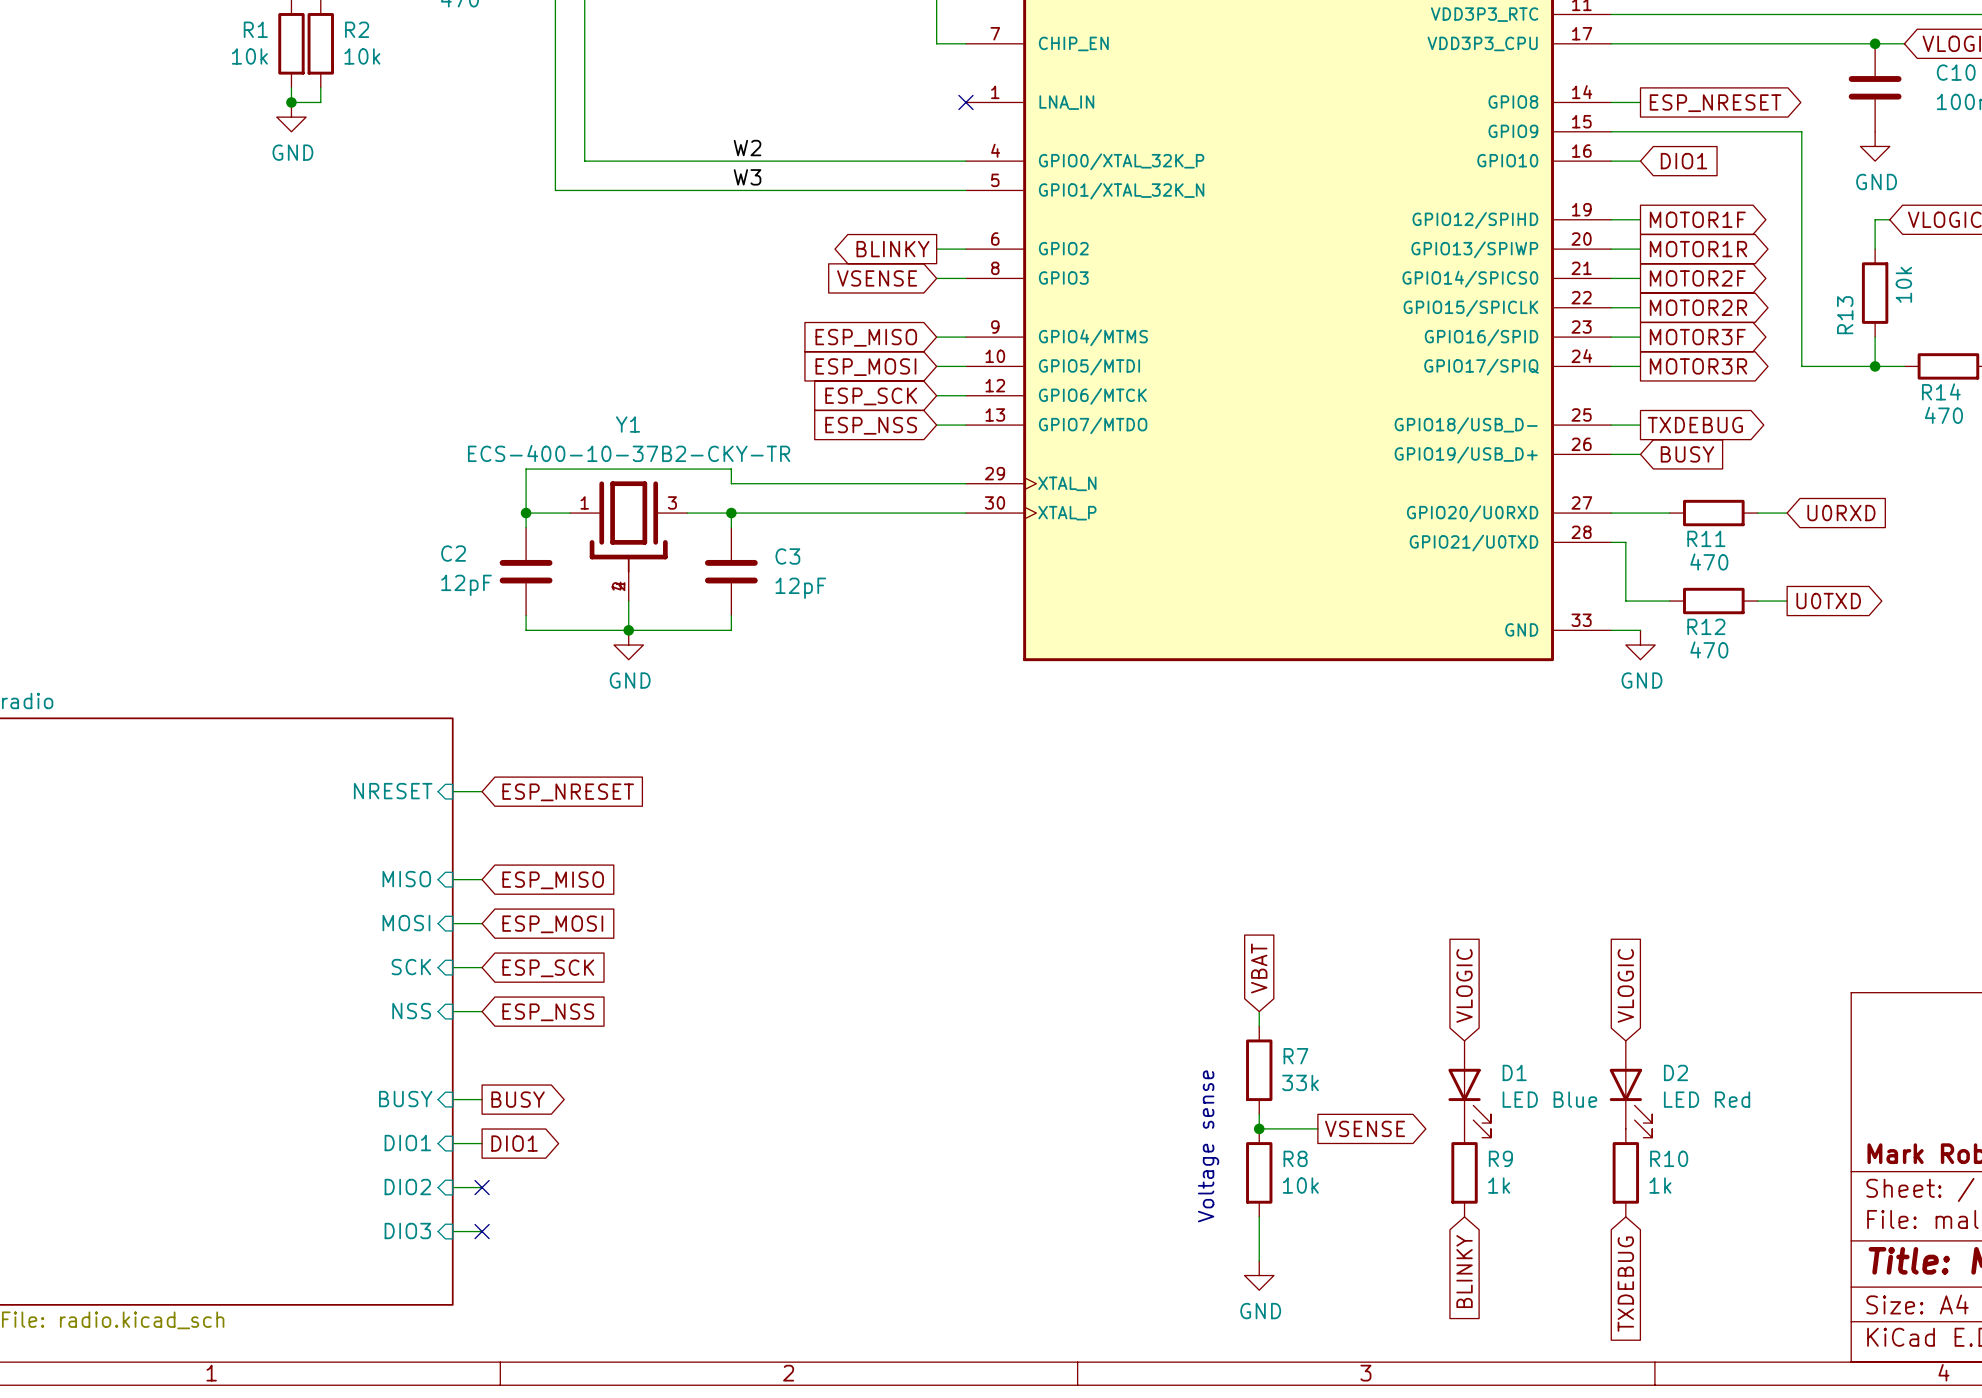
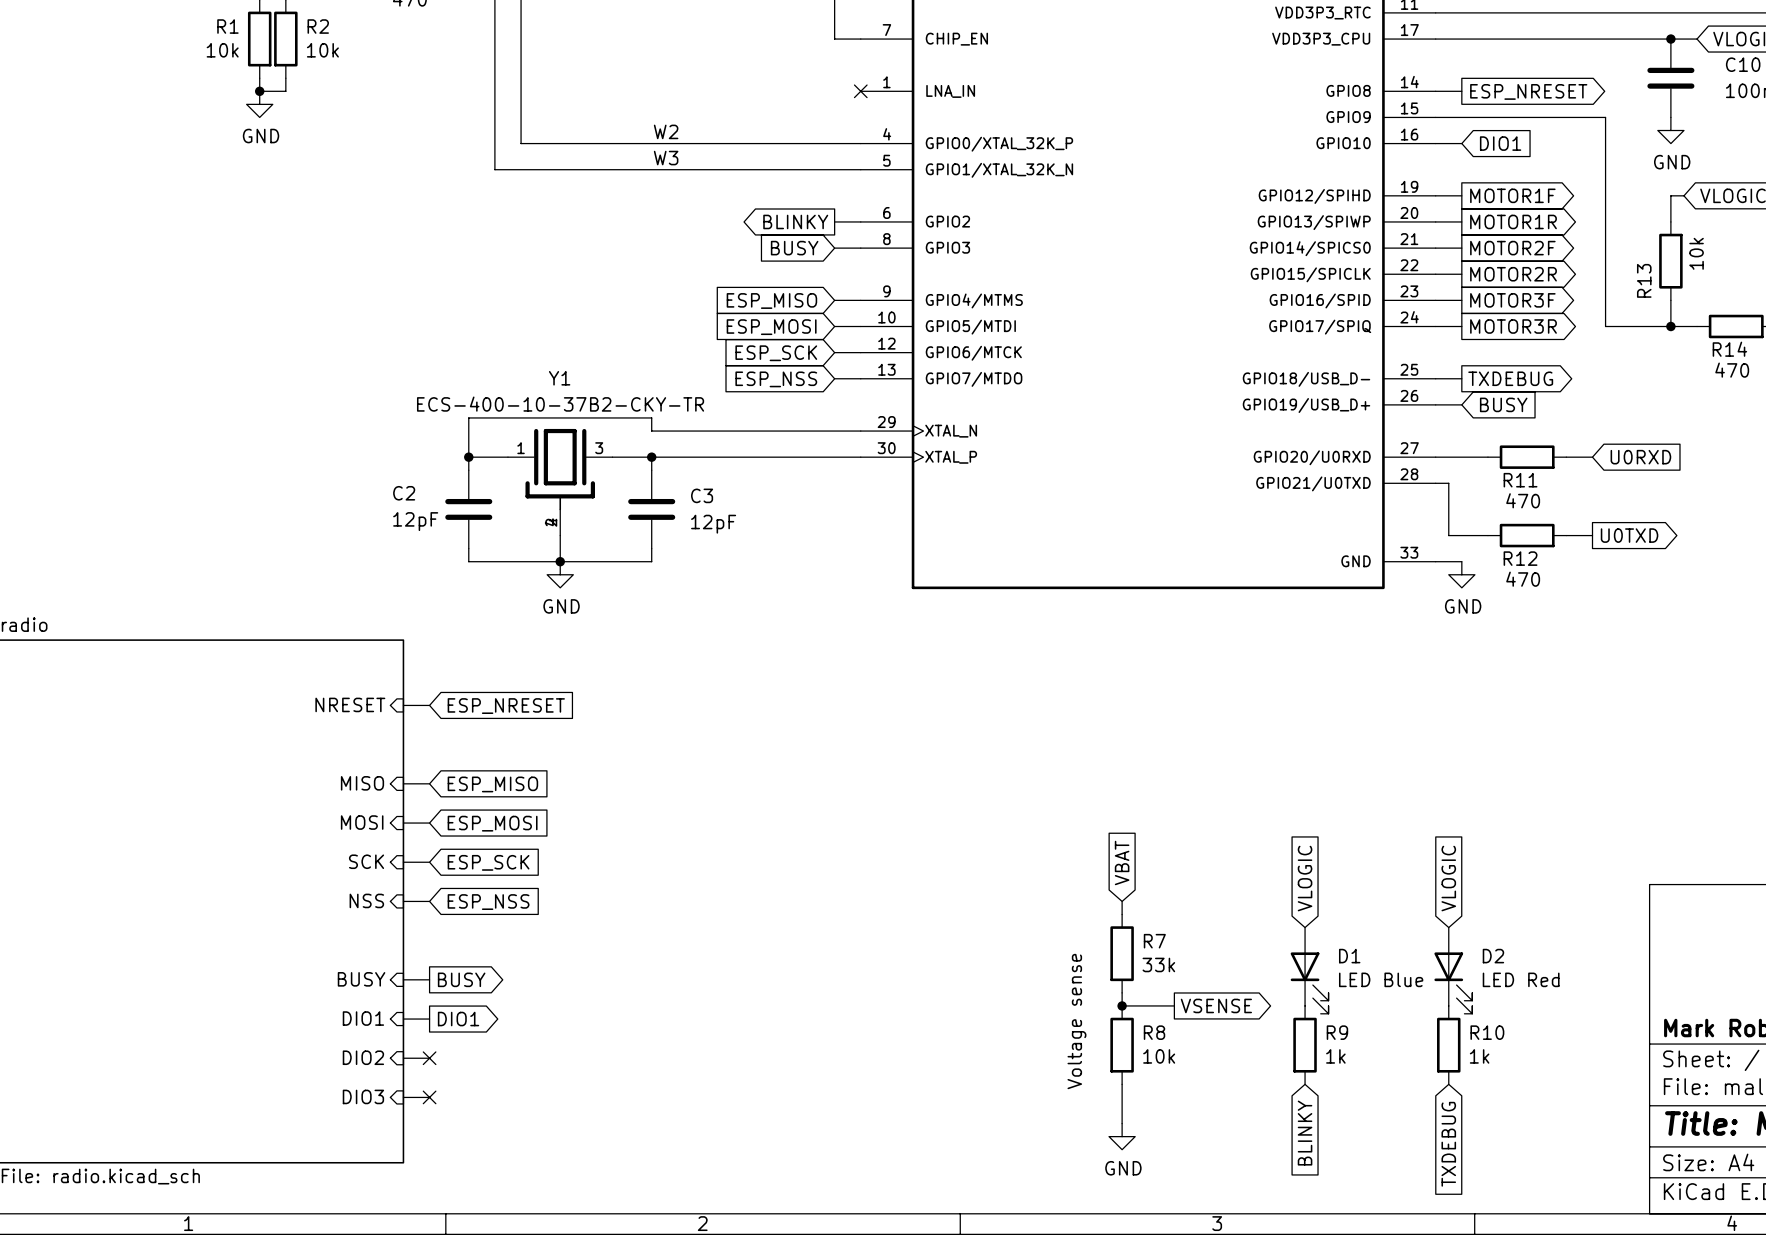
global label: VSENSE (877, 278) -> BUSY (794, 248)

